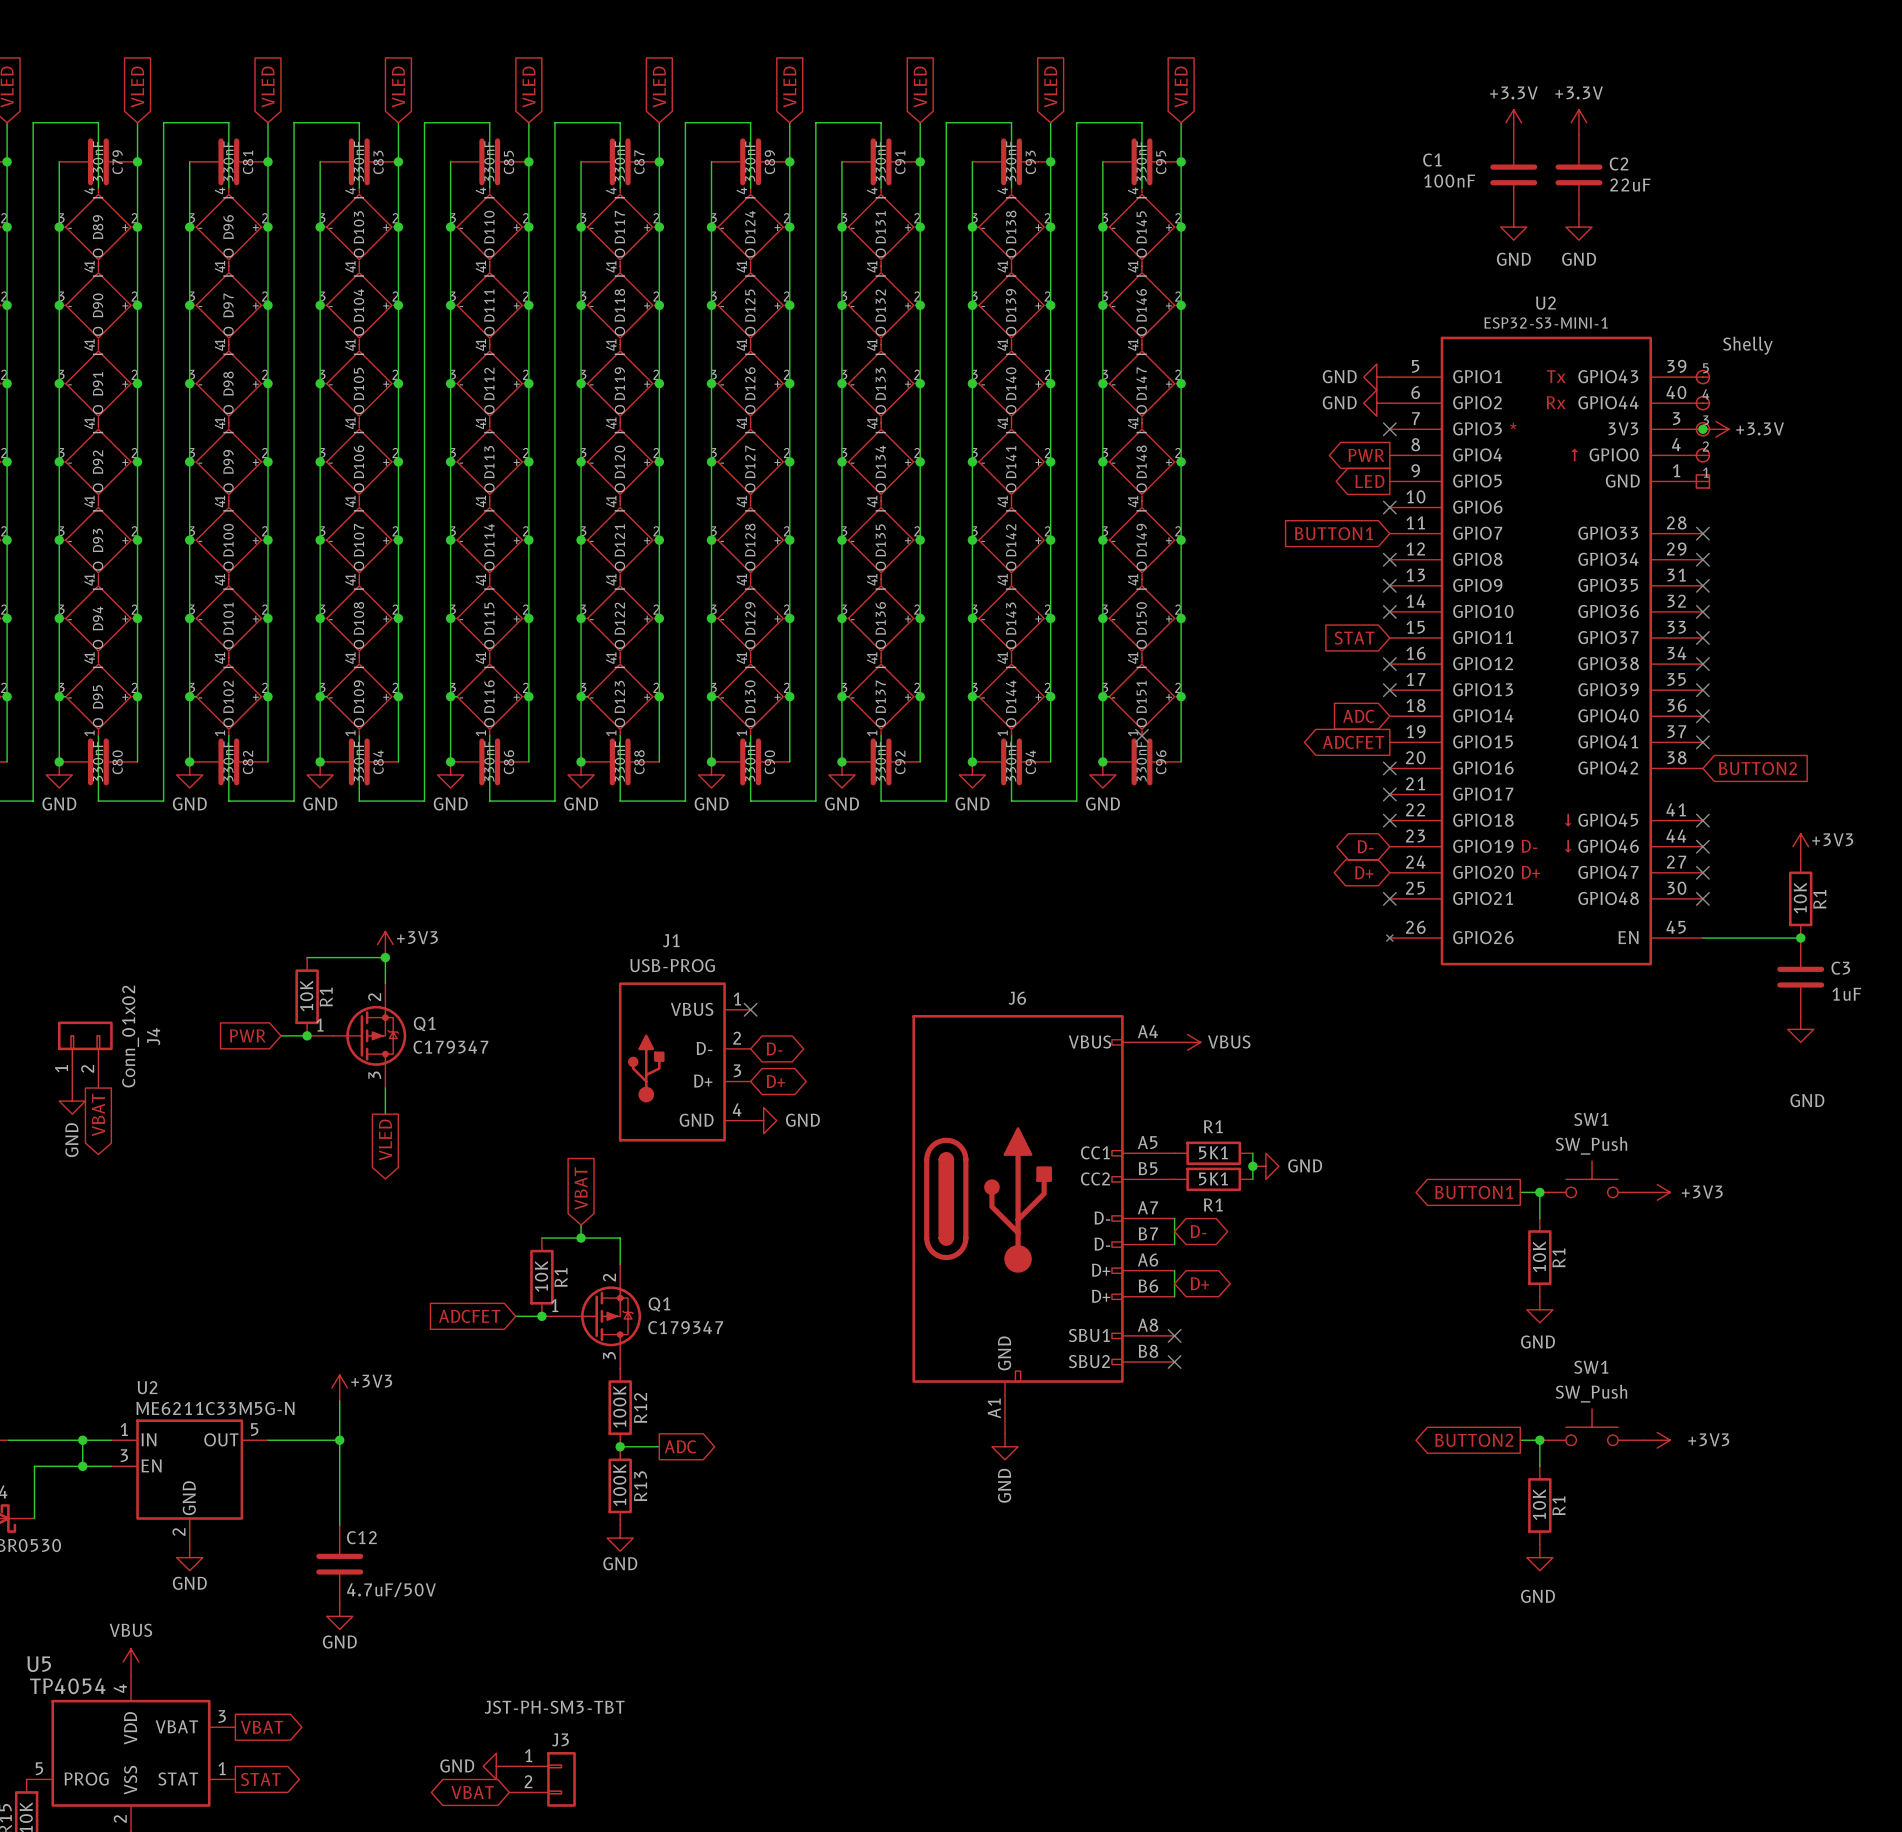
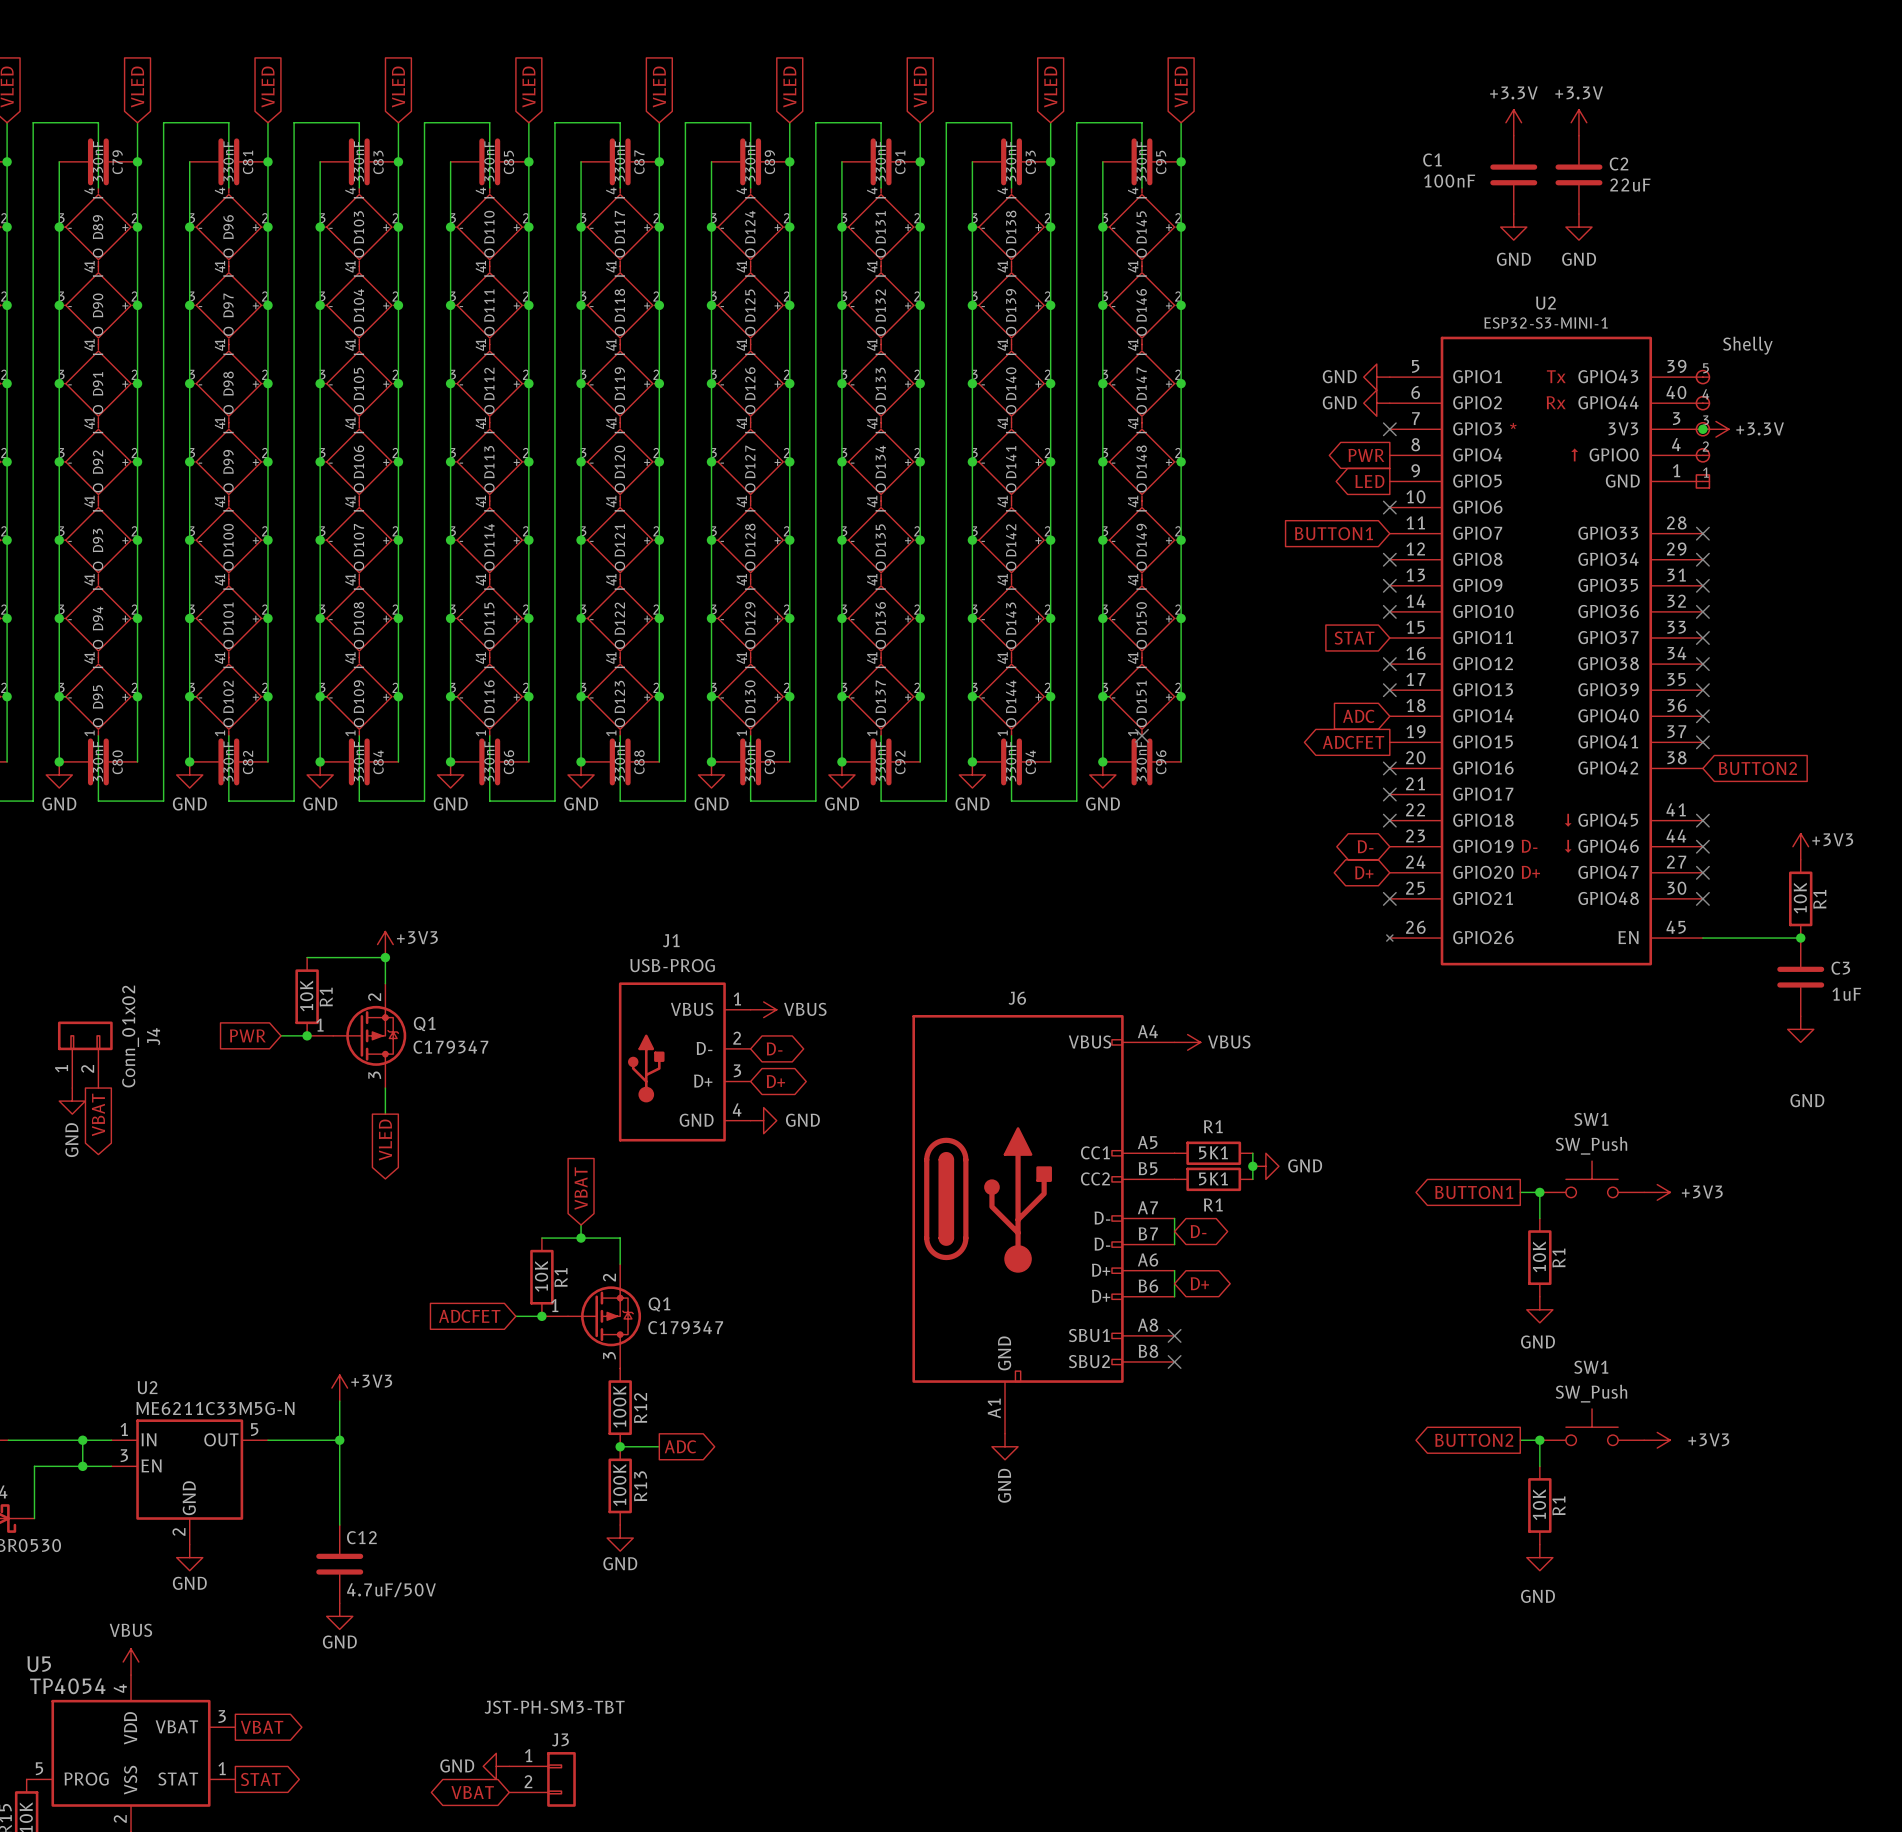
no-connect mark: (750, 1009) -> none
power symbol: none -> VBUS (763, 1009)

